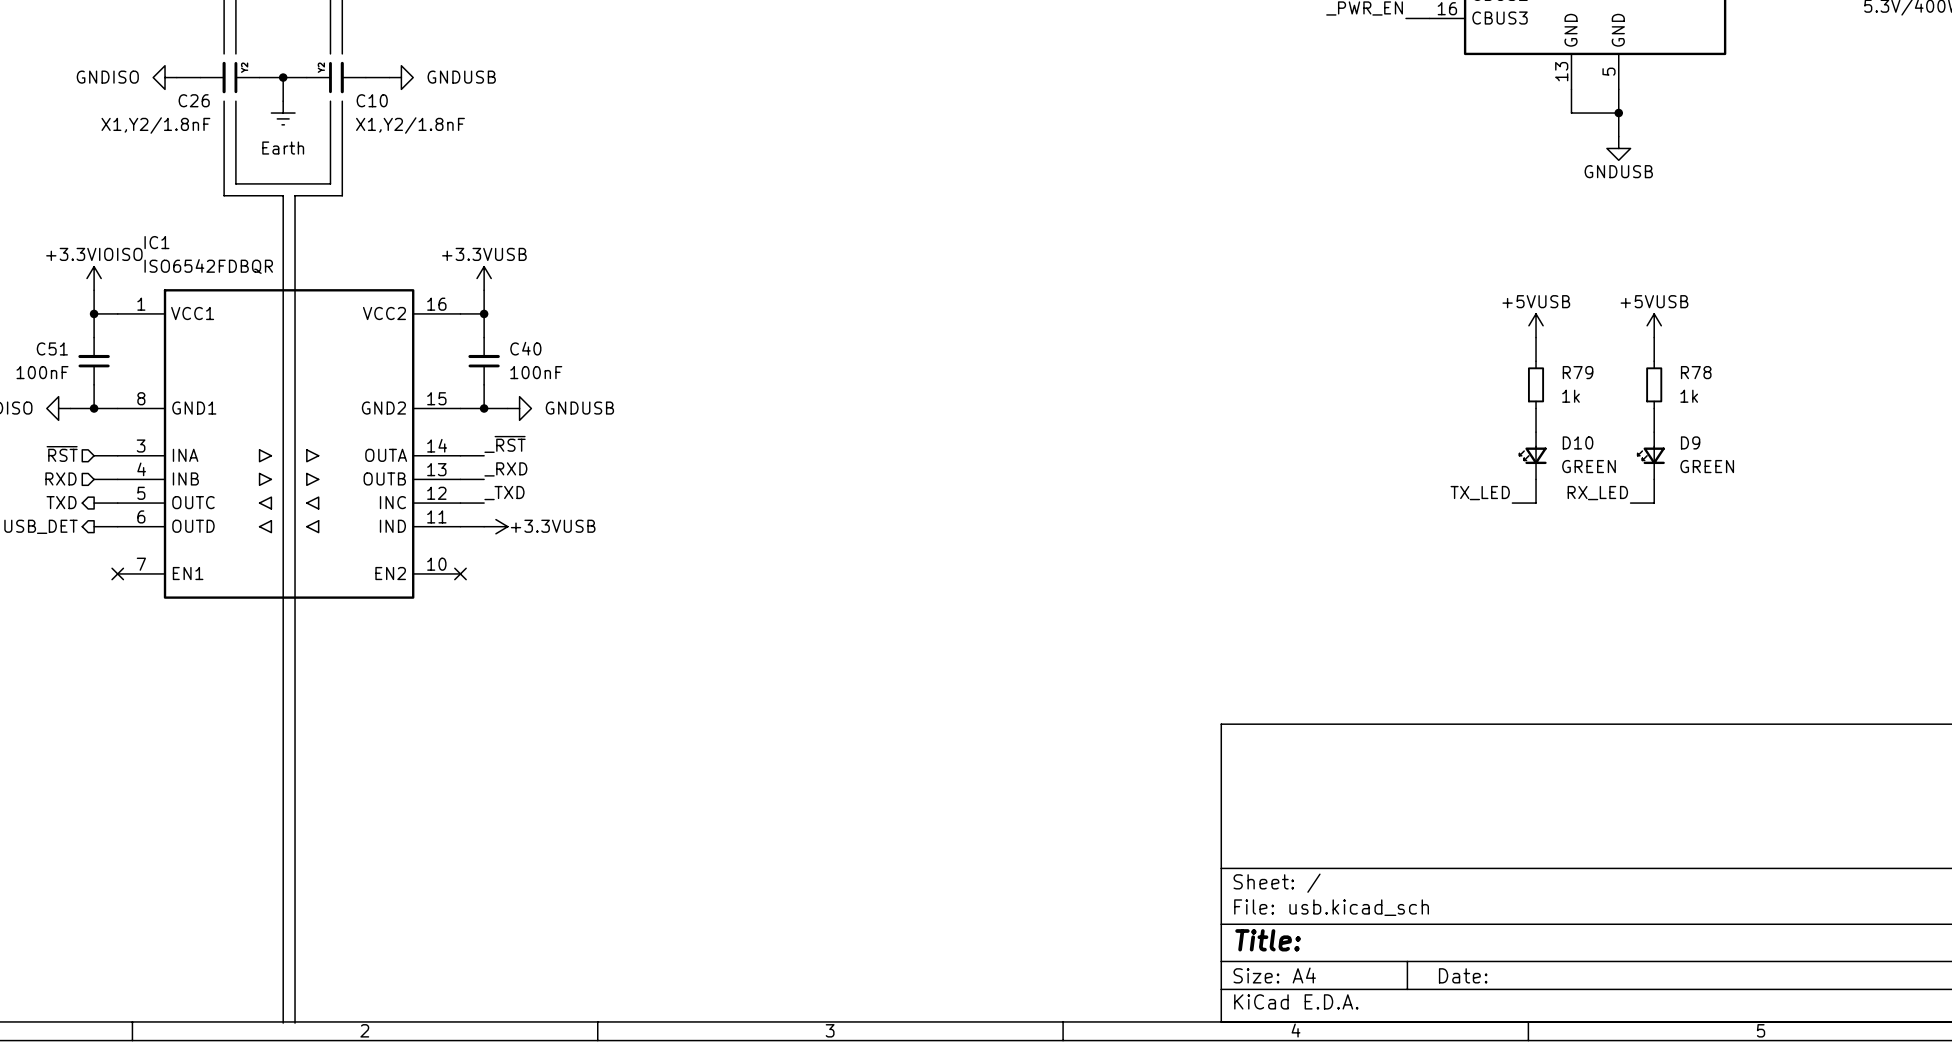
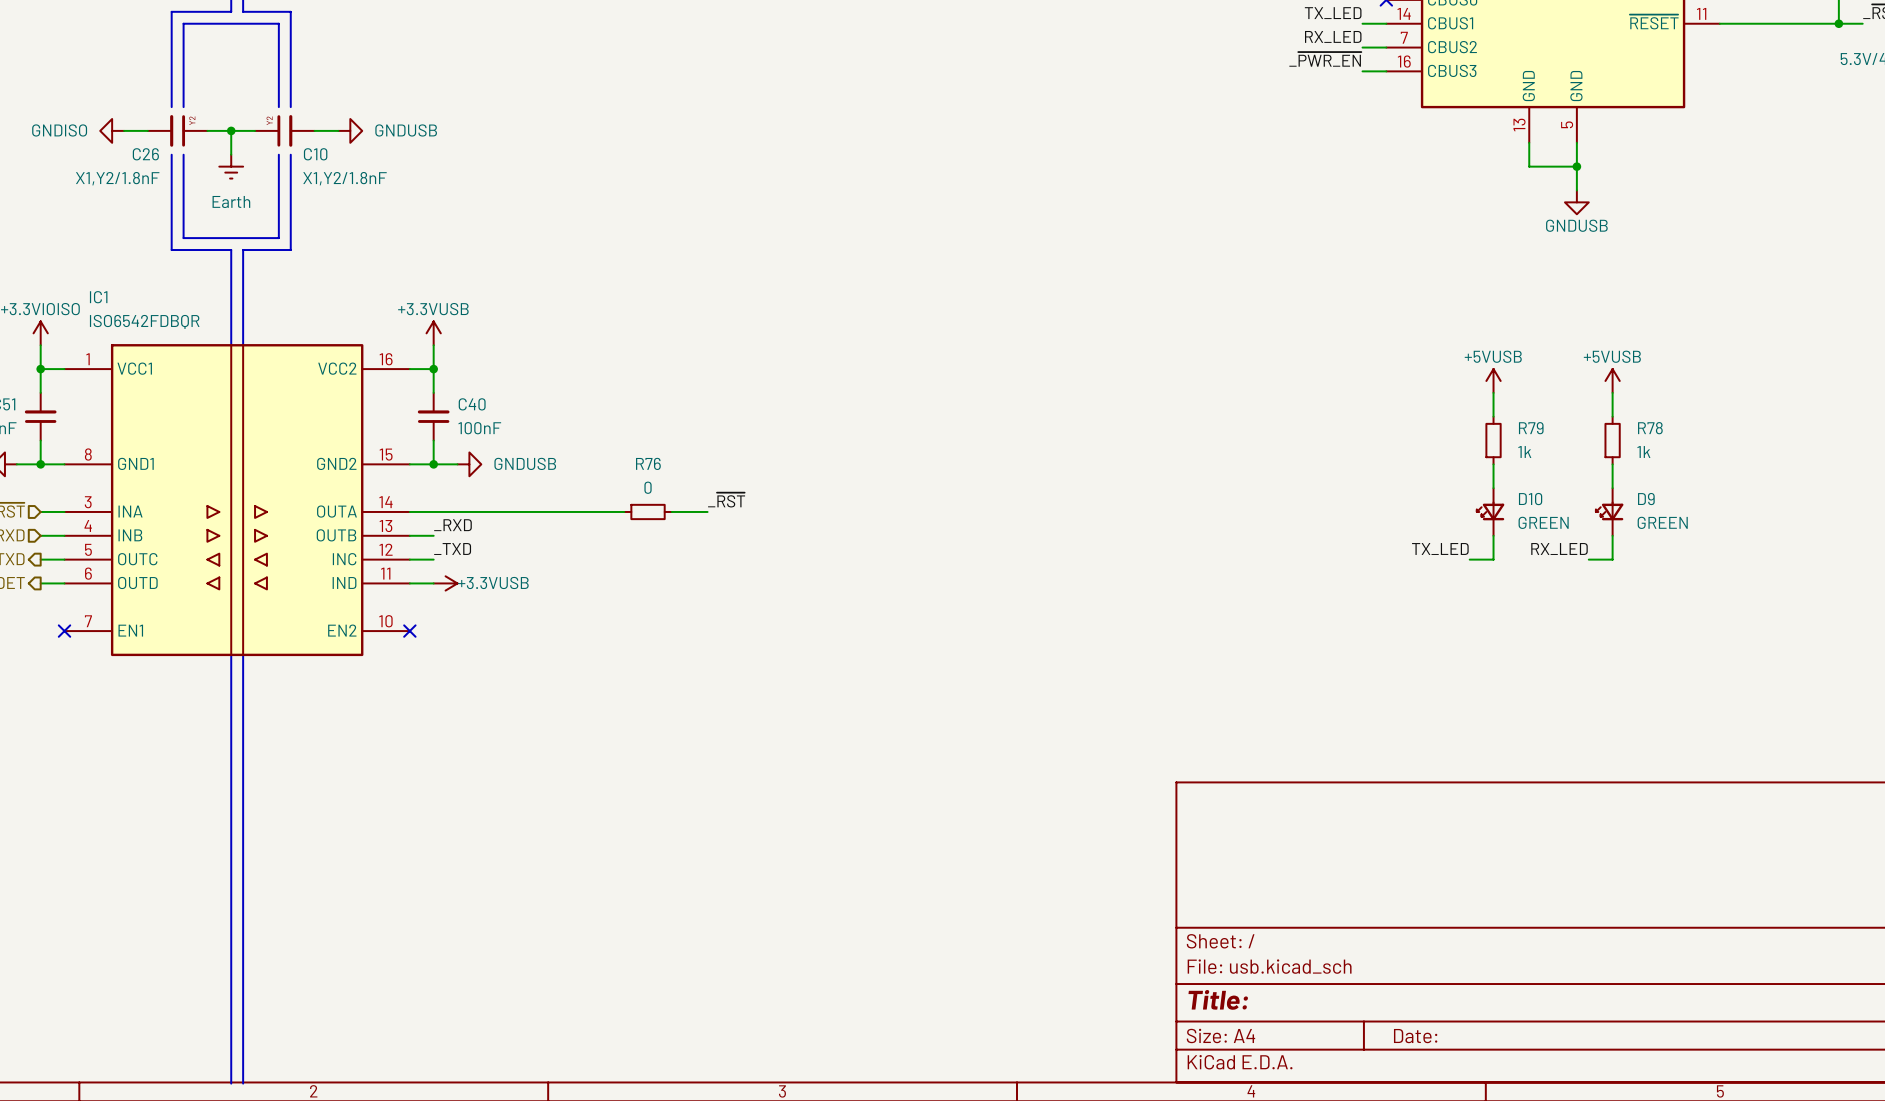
label: _~{RST} (505, 444) -> none
label: none -> _~{RST} (726, 500)
wire: none -> (433, 511) (624, 511)
R76: none -> 0 (648, 511)
wire: none -> (671, 511) (707, 511)

